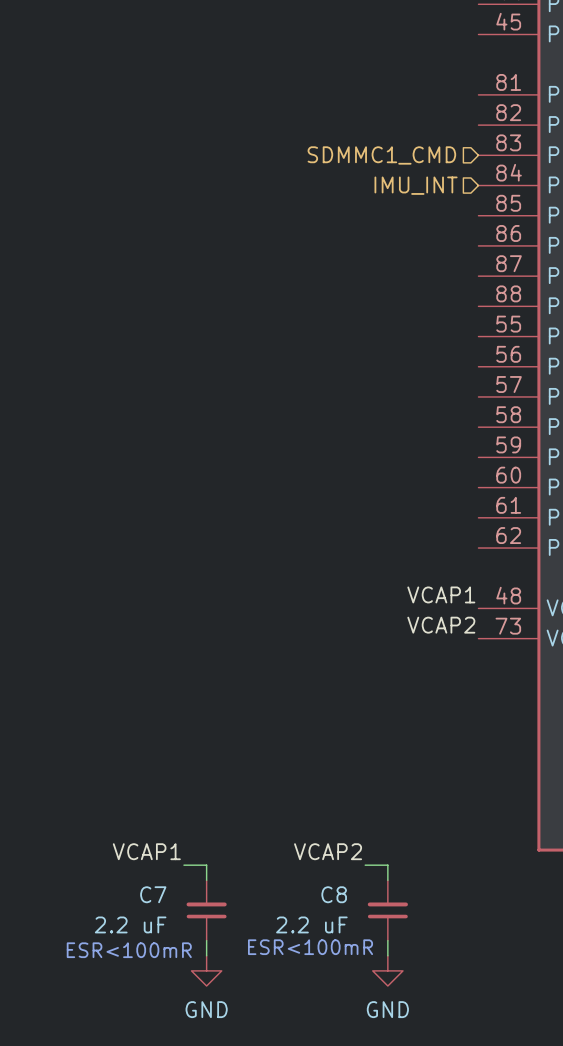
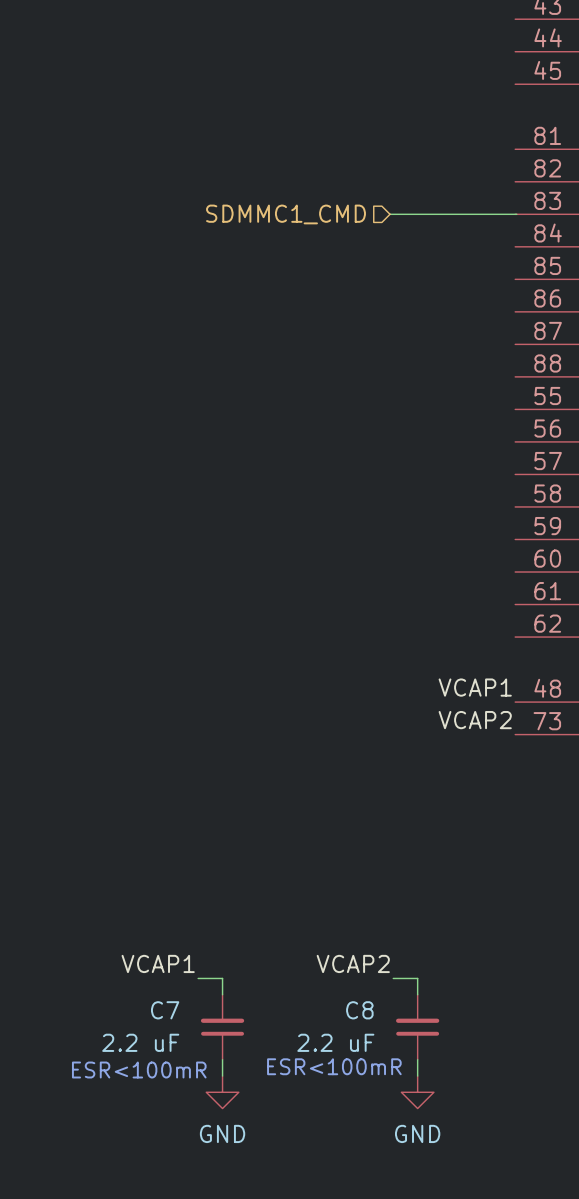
wire: none -> (390, 214) (516, 214)
hierarchical label position: SDMMC1_CMD (381, 155) -> SDMMC1_CMD (286, 214)
hierarchical label: IMU_INT (416, 185) -> none

